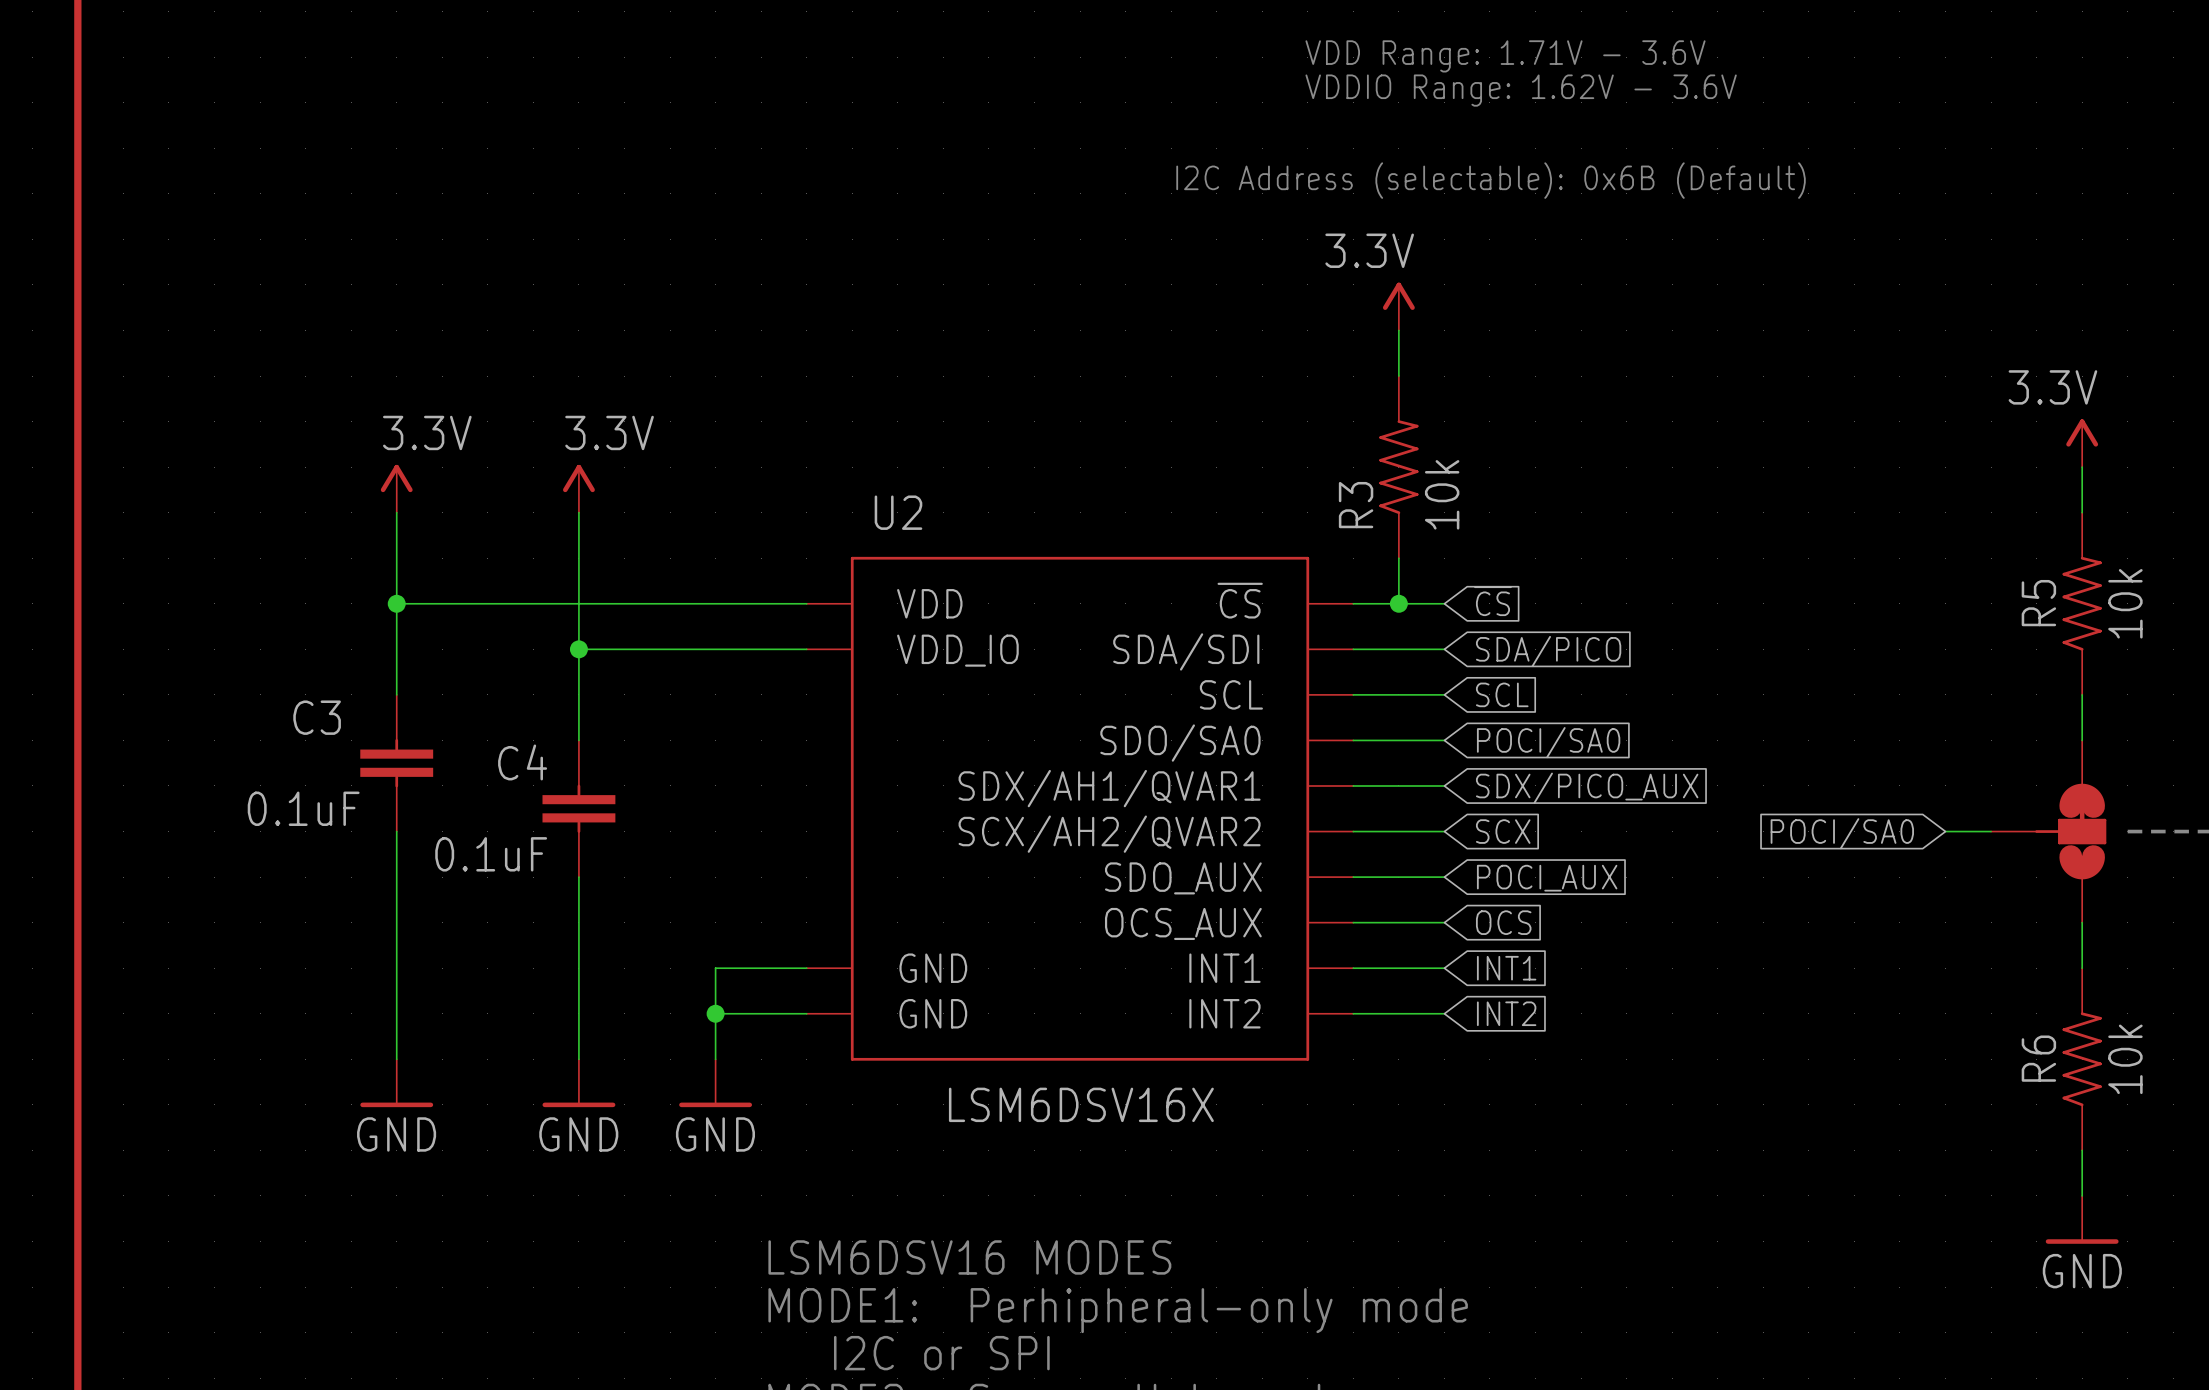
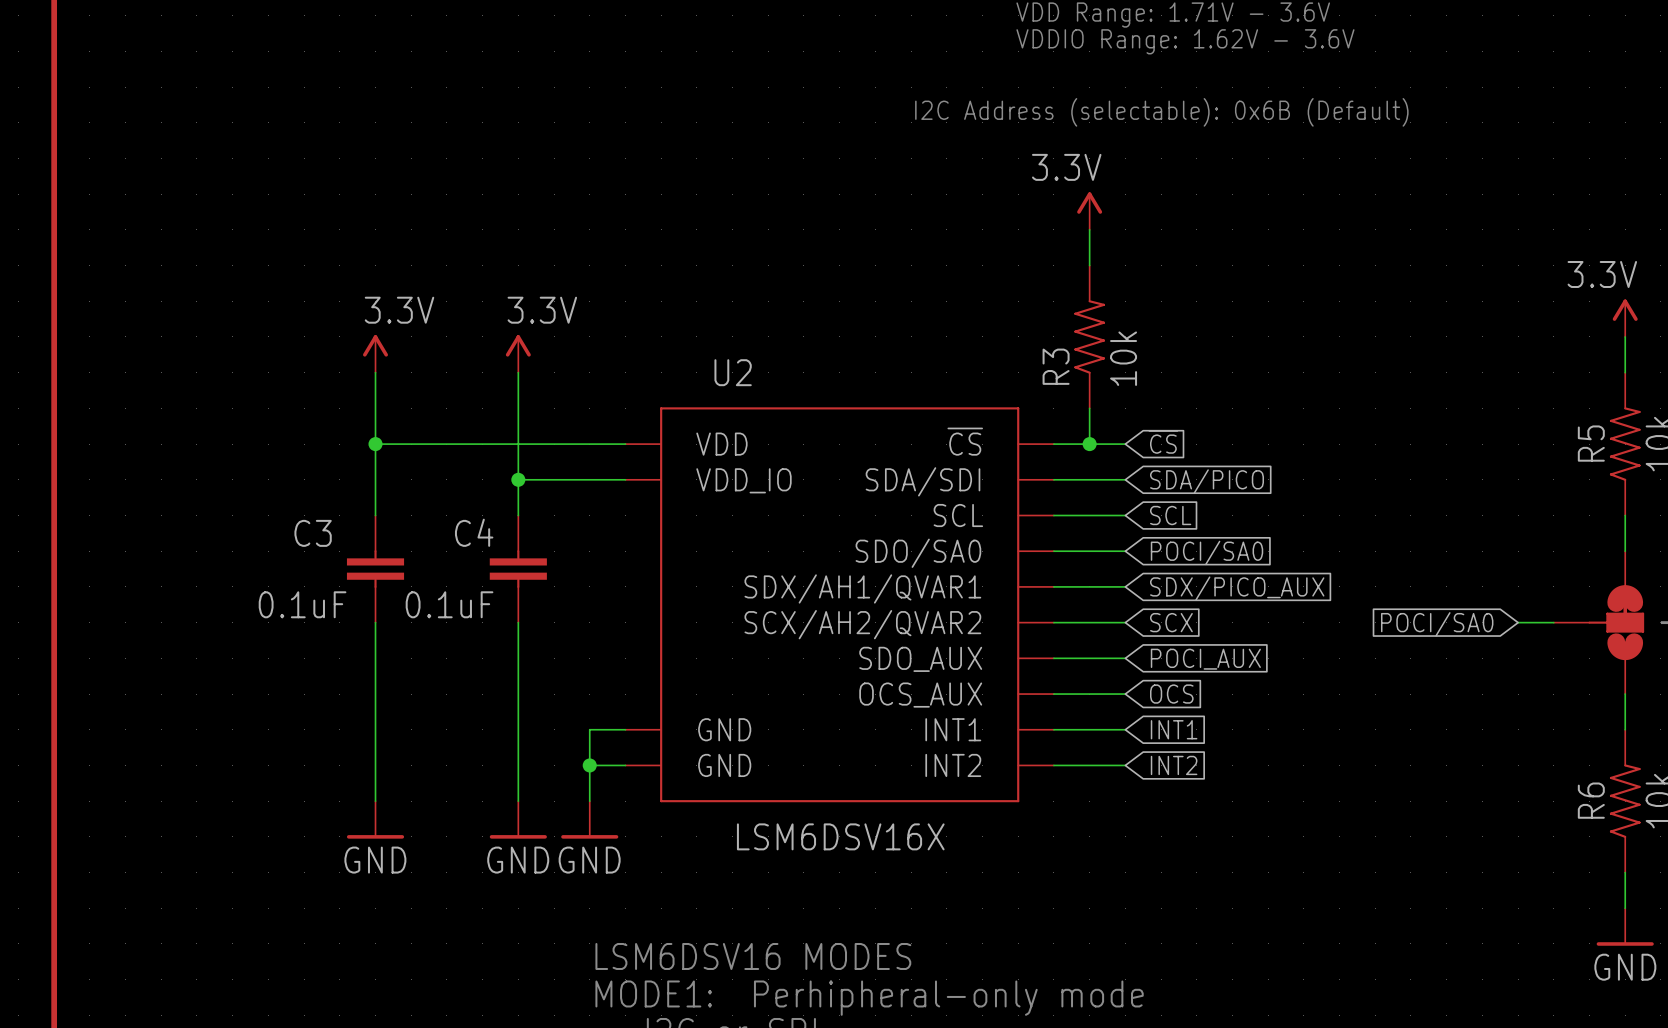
power symbol: 3.3V (396, 488) -> none
power symbol: none -> 3.3V (375, 353)
power symbol: 3.3V (578, 488) -> none
power symbol: none -> 3.3V (518, 353)
wire: (396, 512) (396, 694) -> (375, 372) (375, 515)
wire: (578, 512) (578, 740) -> (518, 622) (518, 801)
U2 name position: U2 (898, 512) -> U2 (733, 372)
wire: (396, 603) (487, 603) -> none
junction: (396, 603) -> none
junction: none -> (375, 444)
wire: (578, 649) (670, 649) -> none
junction: (578, 649) -> none
junction: none -> (518, 479)
C3 position: (396, 763) -> (375, 569)
C4 position: (578, 808) -> (518, 569)
wire: (396, 831) (396, 1059) -> (375, 622) (375, 801)
wire: (578, 877) (578, 1059) -> (518, 372) (518, 515)
wire: (761, 968) (715, 968) (715, 1059) -> (589, 729) (589, 801)
wire: (715, 1013) (761, 1013) -> none
junction position: (715, 1013) -> (589, 765)
power symbol: GND (396, 1083) -> none
power symbol: none -> GND (375, 819)
power symbol: GND (578, 1083) -> none
power symbol: none -> GND (518, 819)
power symbol: GND (715, 1083) -> none
power symbol: none -> GND (589, 819)

